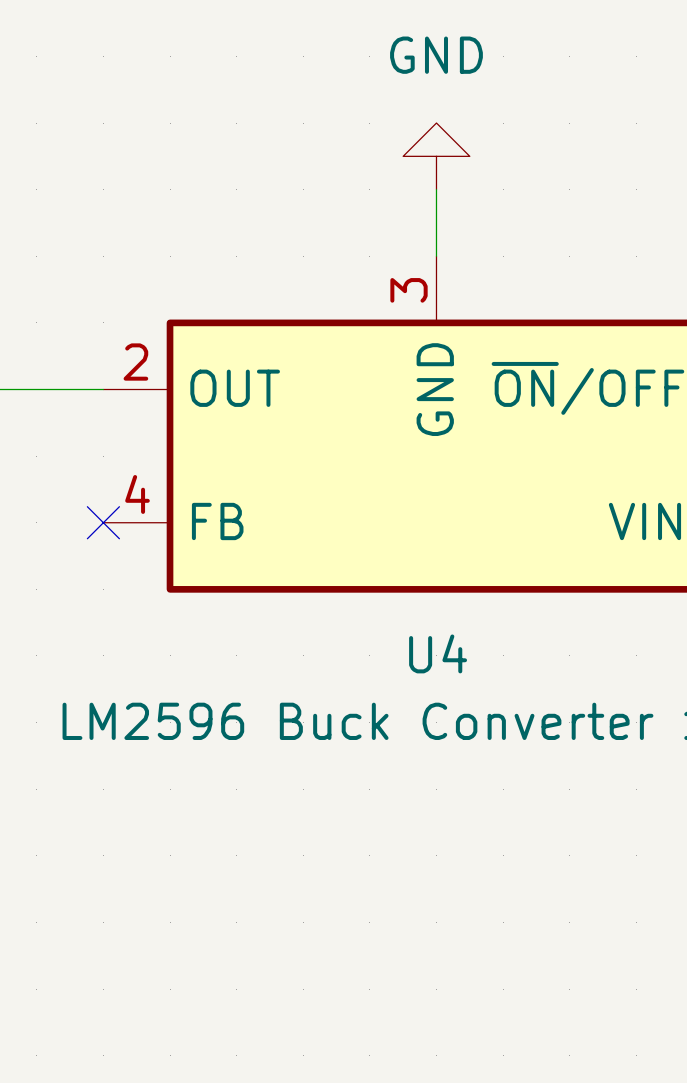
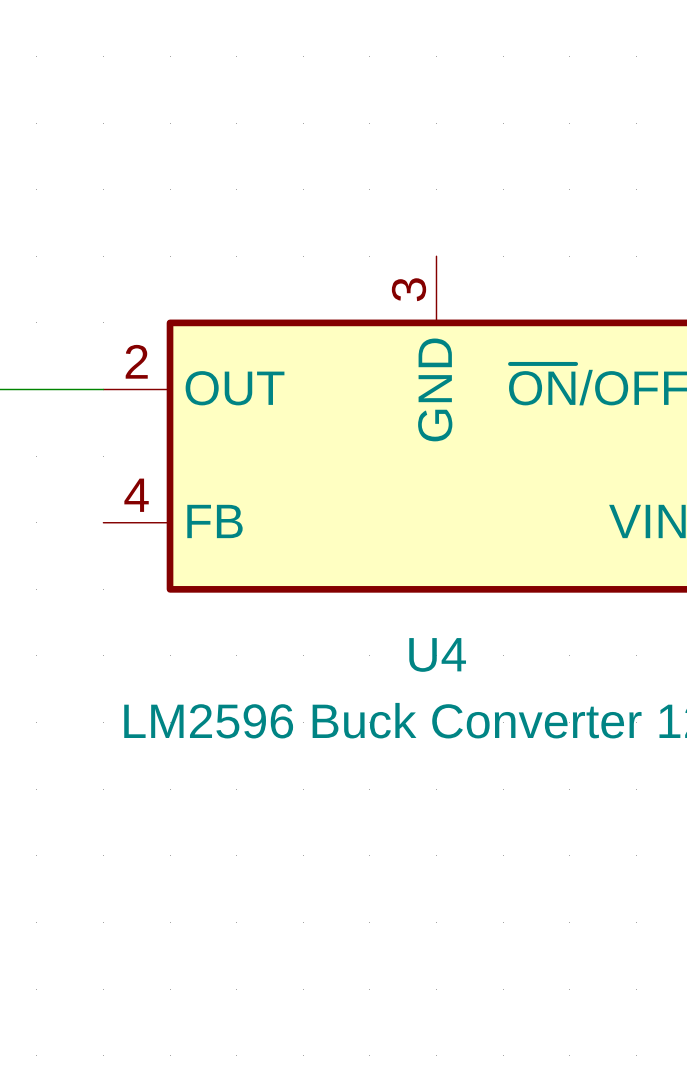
power symbol: GND (436, 156) -> none
wire: (436, 189) (436, 256) -> none
no-connect mark: (103, 522) -> none

